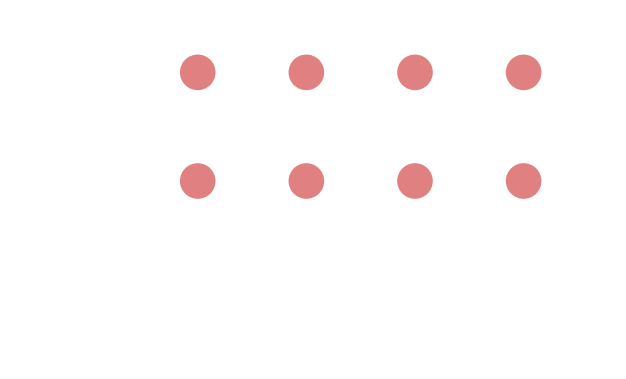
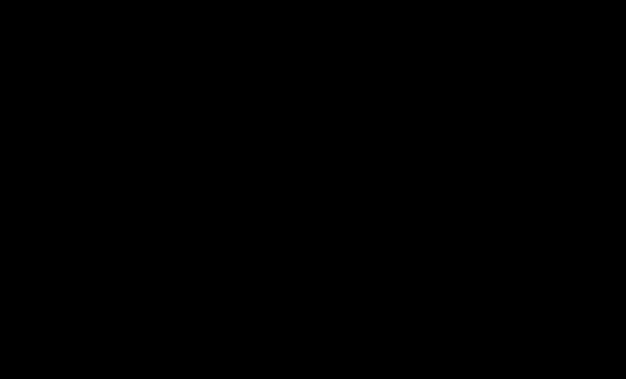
part: (197, 72) -> none
part: (306, 72) -> none
part: (414, 72) -> none
part: (523, 72) -> none
part: (197, 181) -> none
part: (306, 181) -> none
part: (414, 181) -> none
part: (523, 181) -> none

